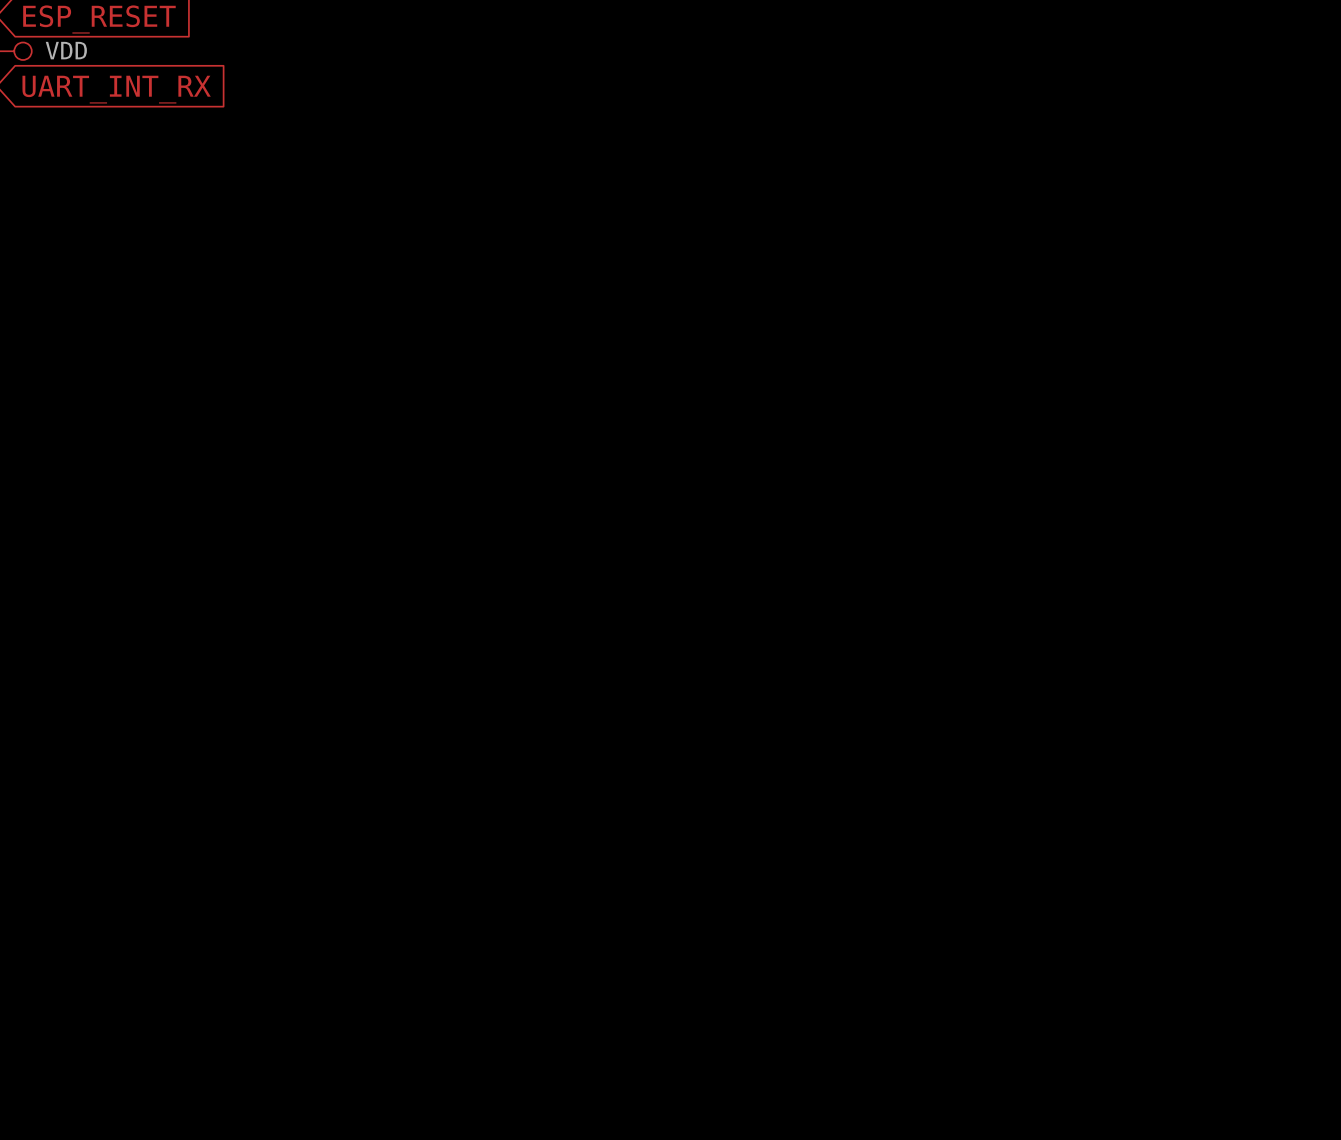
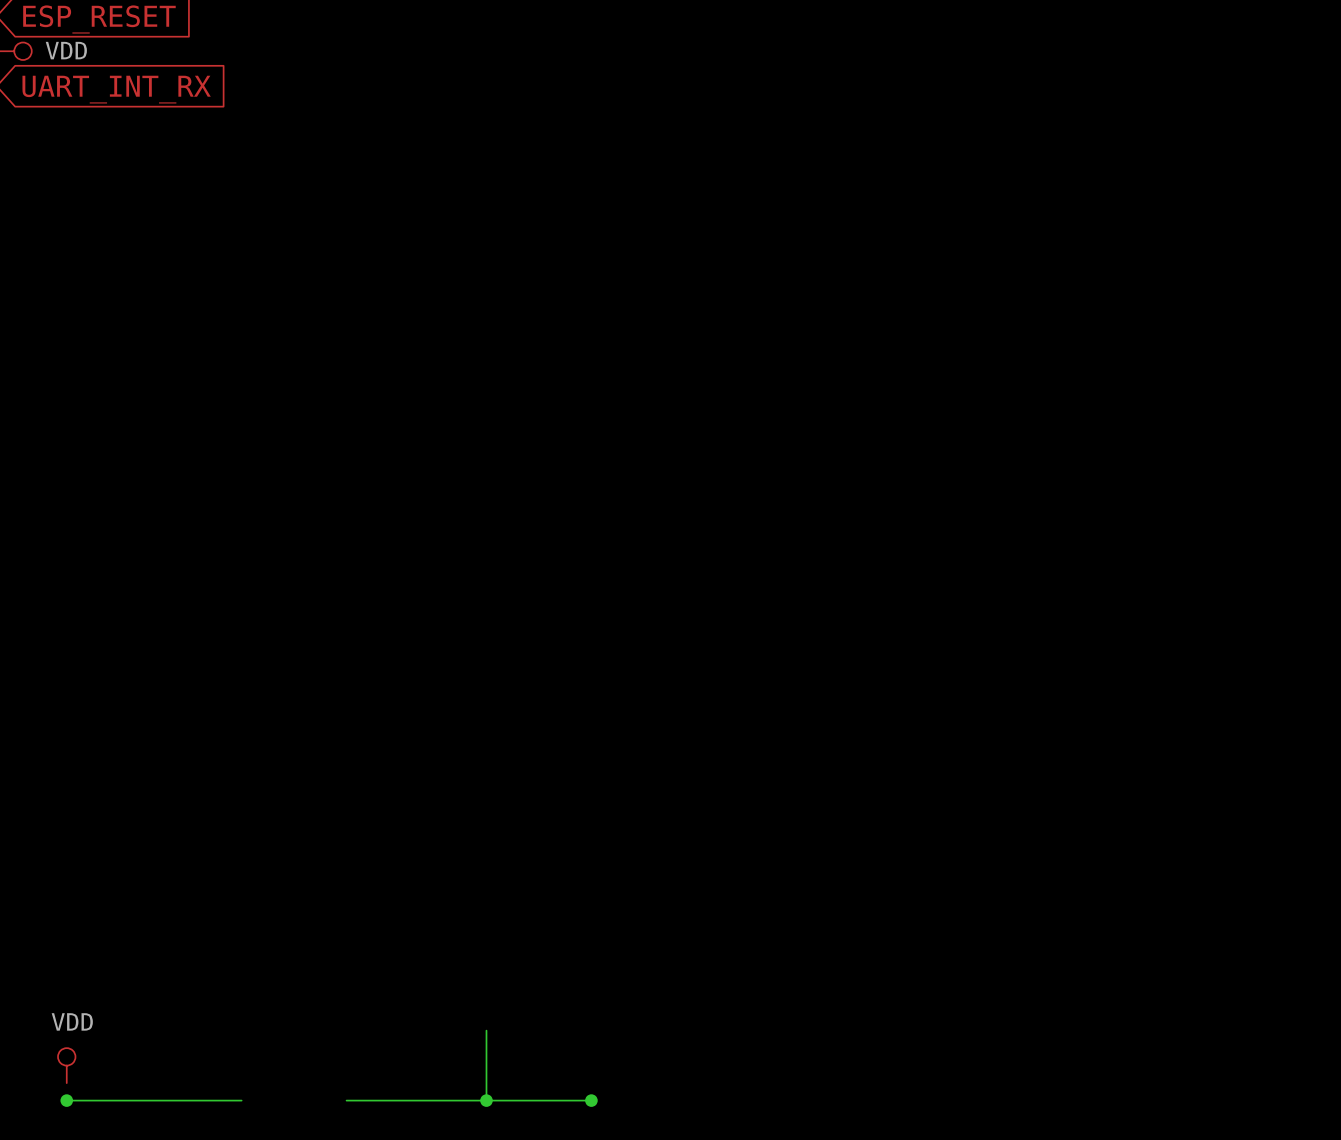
wire: none -> (486, 1030) (486, 1100)
power symbol: none -> VDD (66, 1065)
wire: none -> (66, 1100) (241, 1100)
junction: none -> (66, 1100)
wire: none -> (346, 1100) (591, 1100)
junction: none -> (486, 1100)
junction: none -> (591, 1100)

